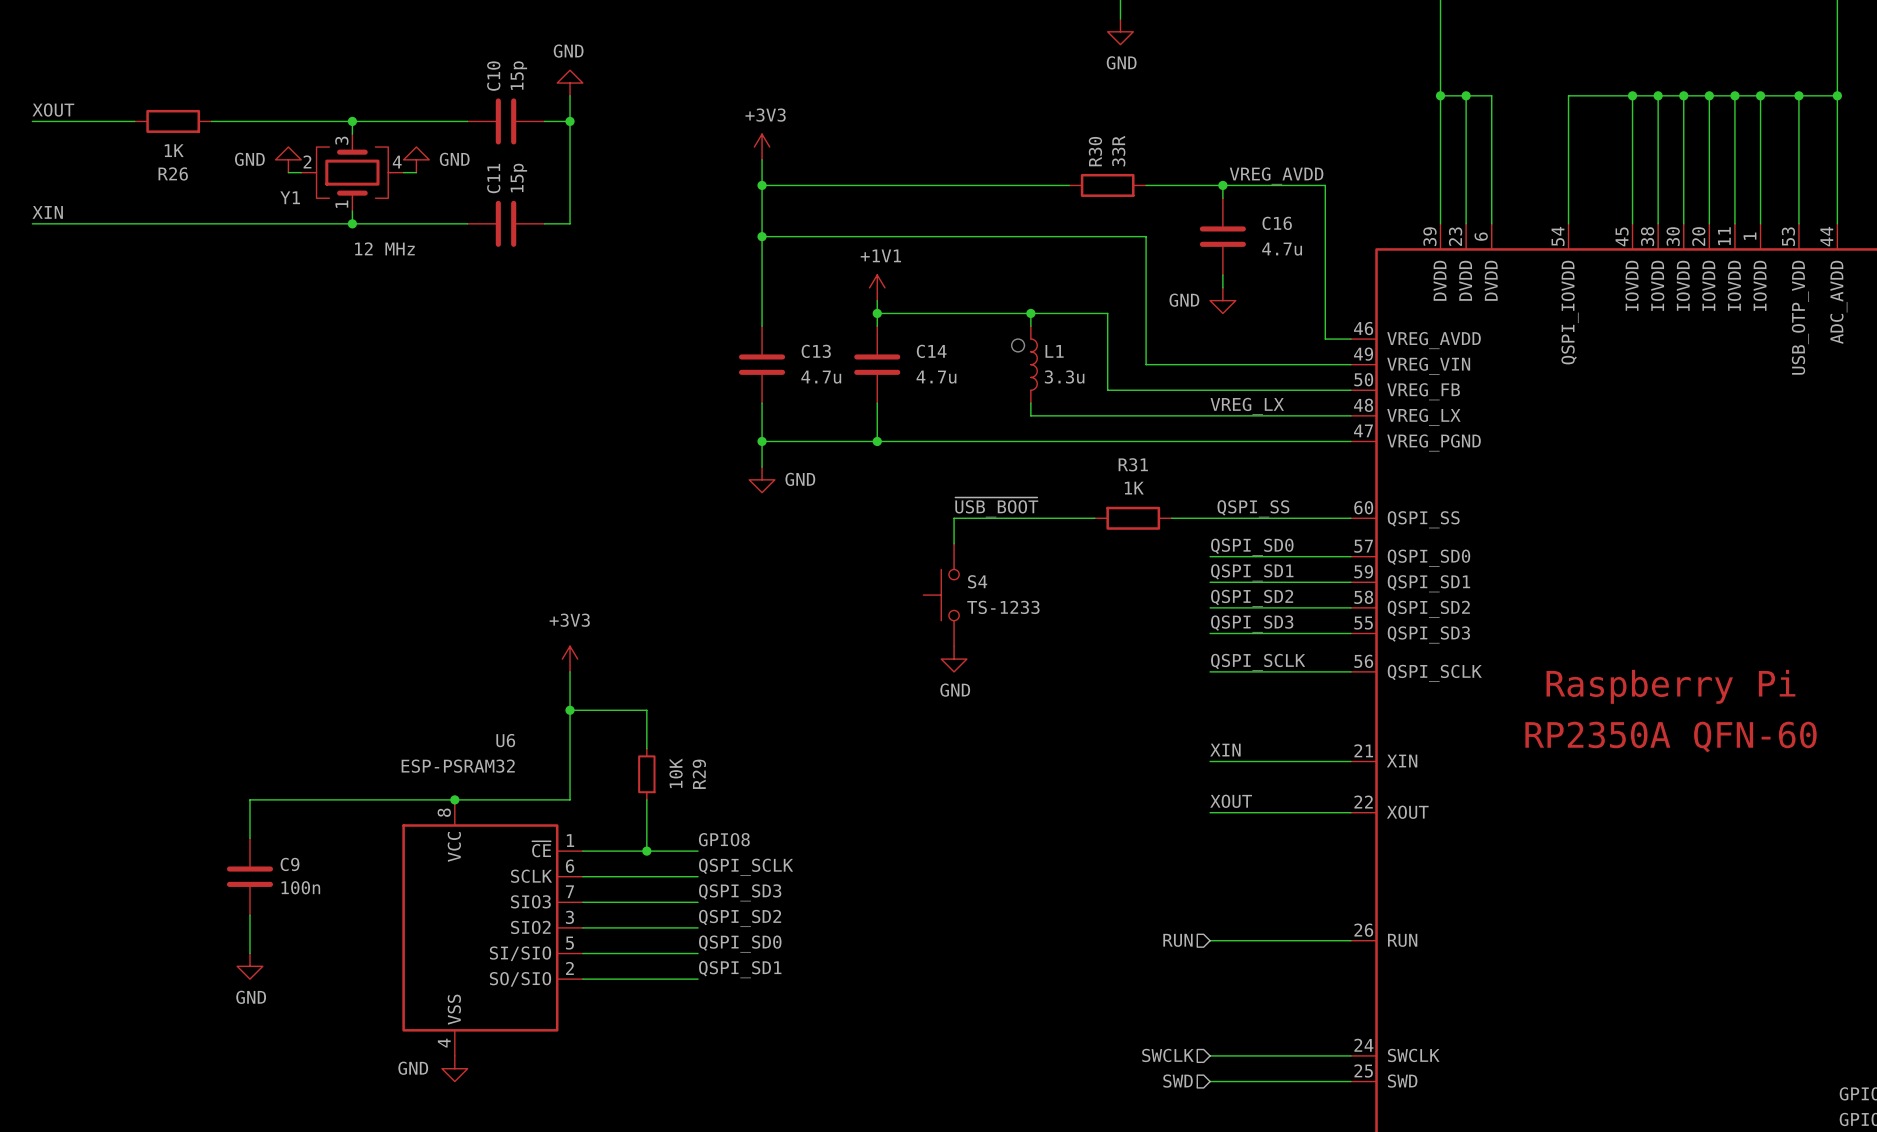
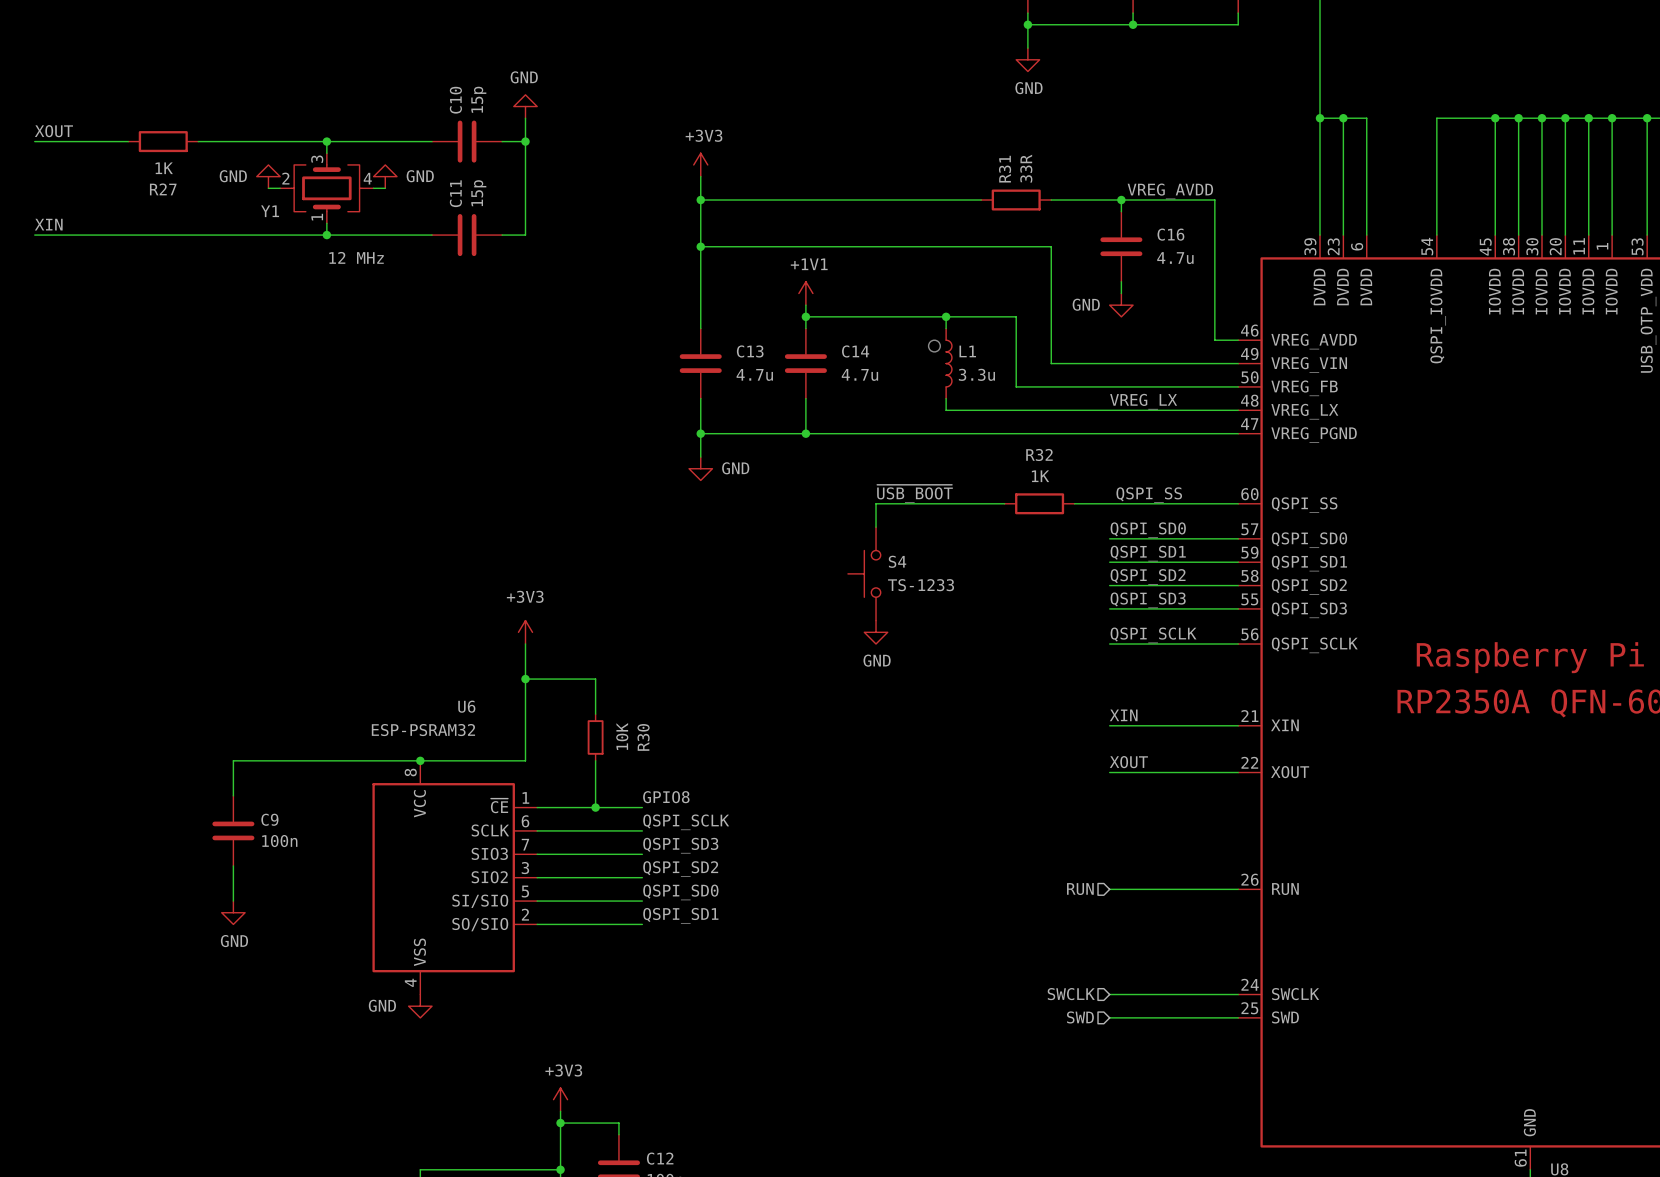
R30 name: R30 (1095, 151) -> R31 (1005, 169)
R26 name: R26 (173, 173) -> R27 (163, 189)
R31 name: R31 (1133, 464) -> R32 (1039, 454)
R29 name: R29 (699, 774) -> R30 (643, 737)

